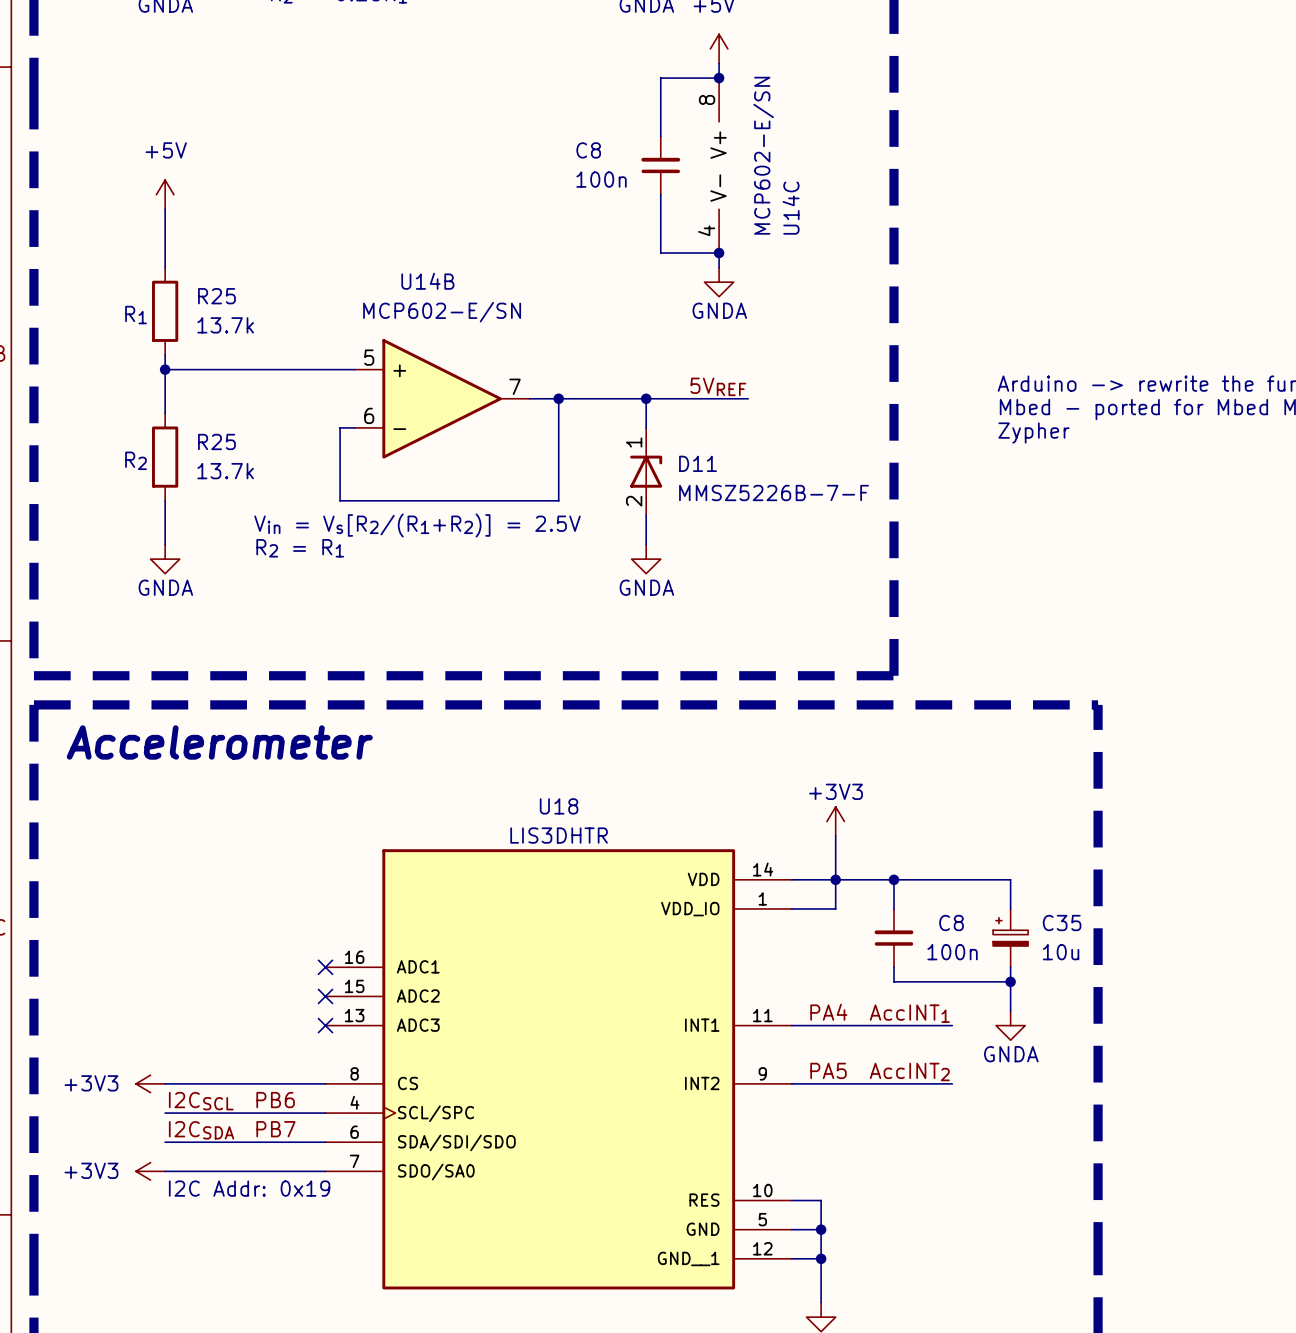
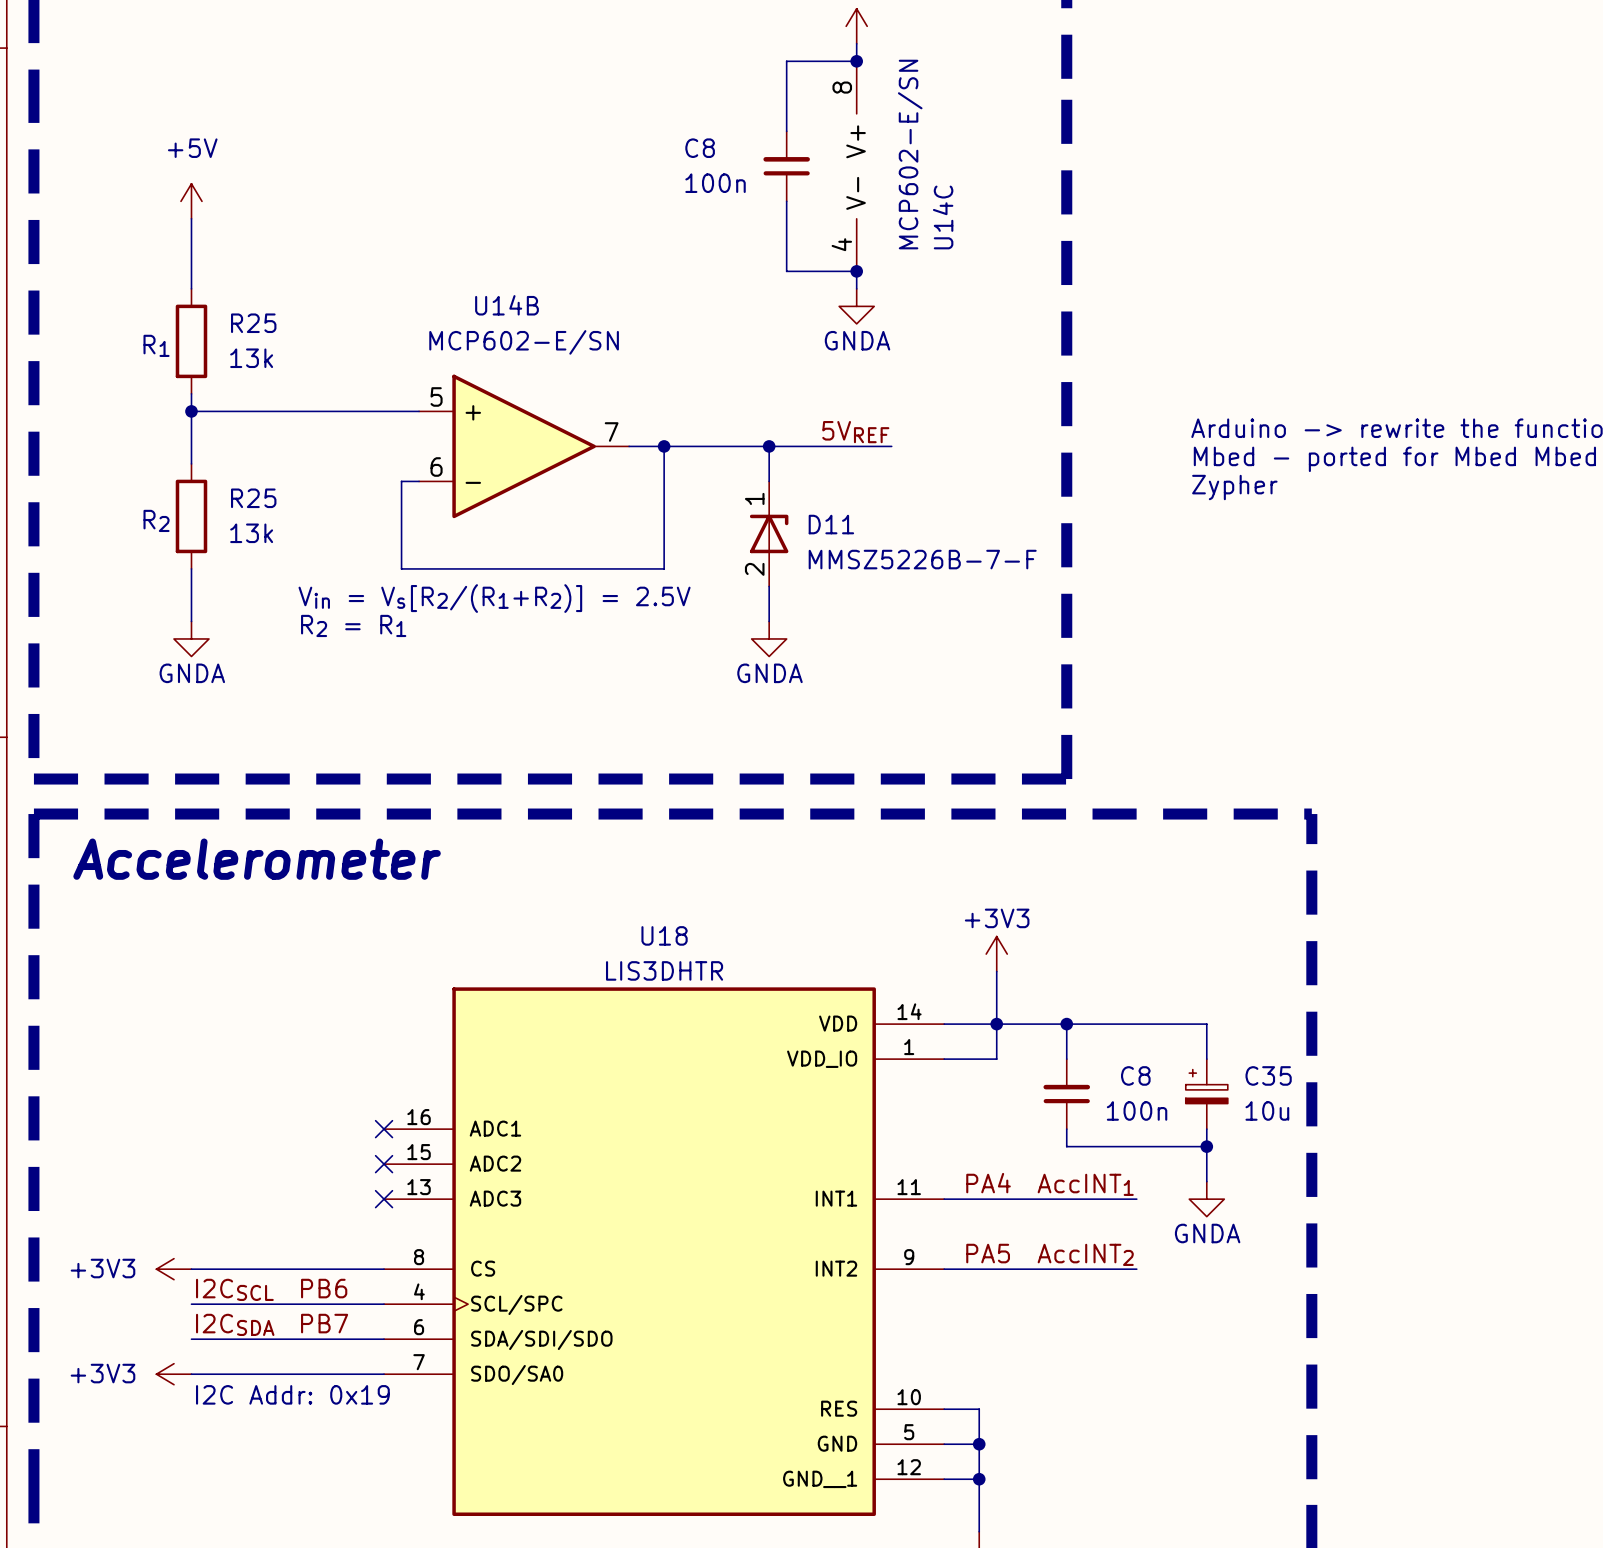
R25 value: 13.7k (225, 325) -> 13k (251, 358)
R25 value: 13.7k (225, 471) -> 13k (251, 533)

